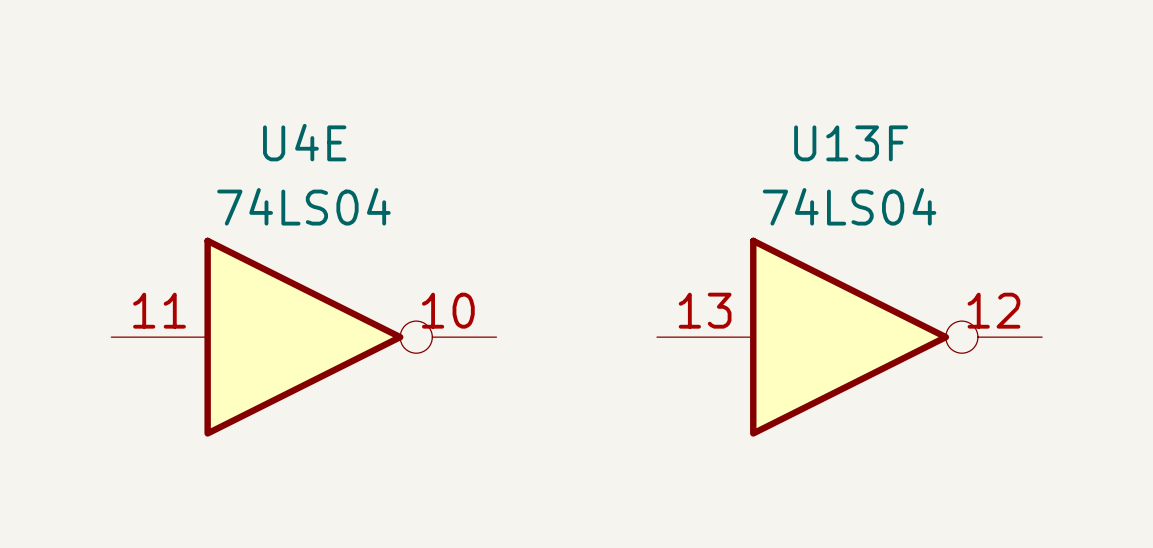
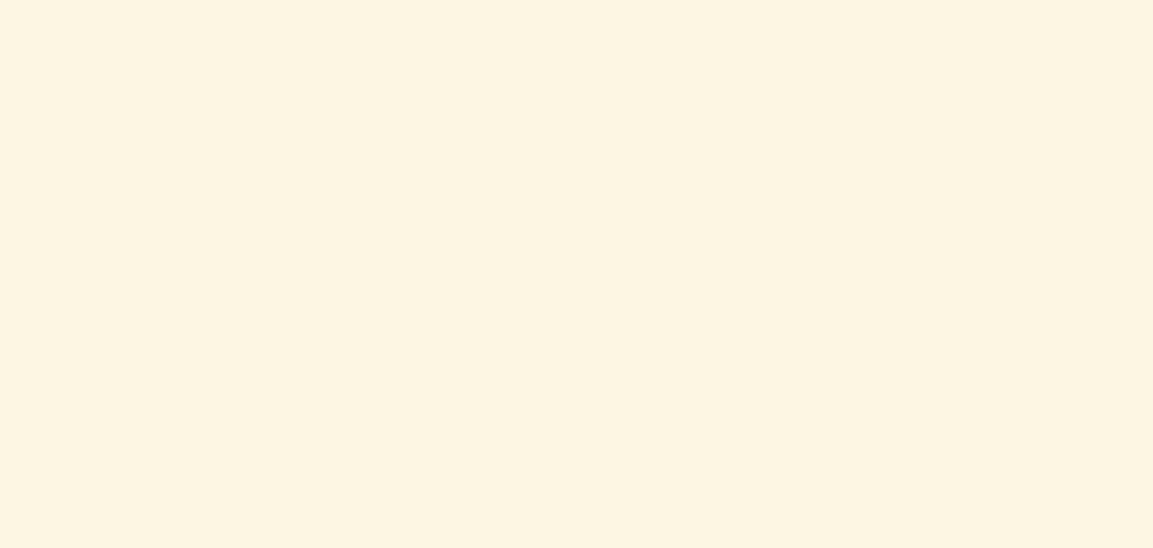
U4E: 74LS04 (303, 337) -> none
U13F: 74LS04 (849, 337) -> none

